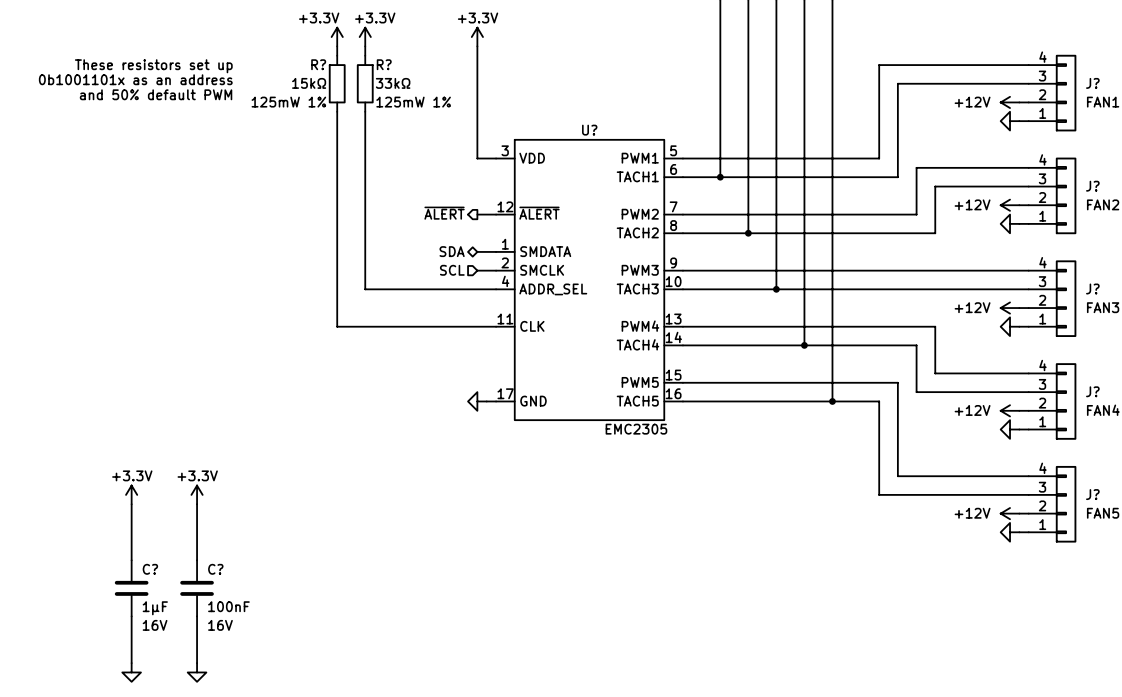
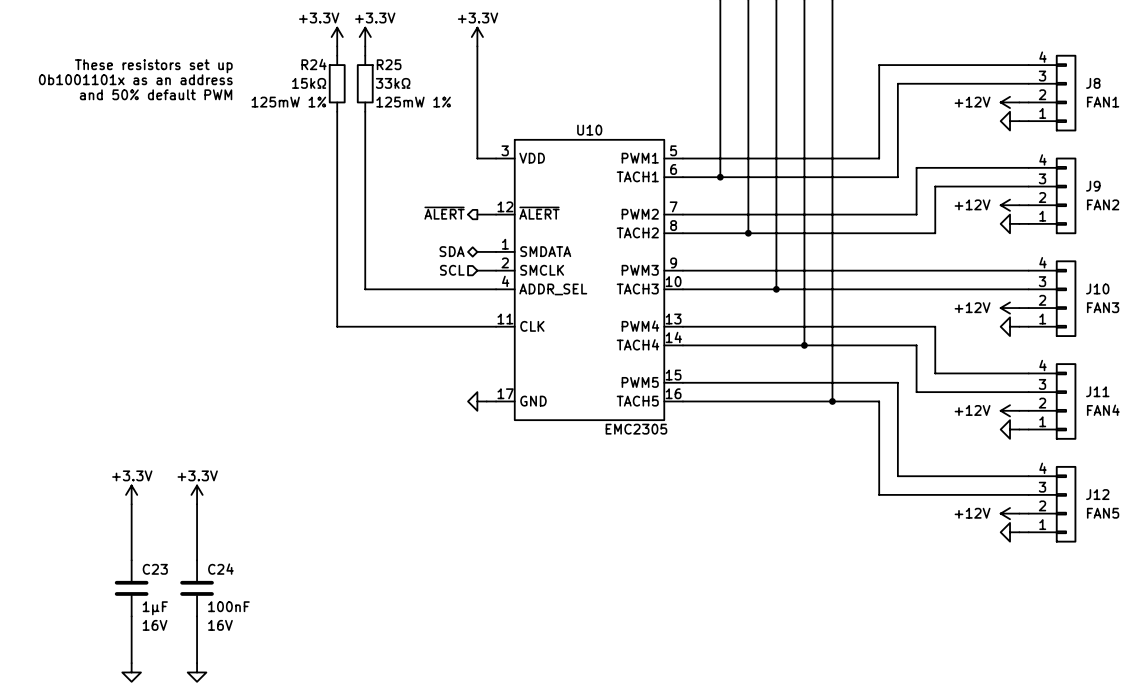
R? name: R? (318, 64) -> R24 (314, 64)
R? name: R? (384, 64) -> R25 (389, 64)
J? name: J? (1092, 83) -> J8 (1093, 83)
U? name: U? (589, 130) -> U10 (589, 130)
J? name: J? (1092, 186) -> J9 (1093, 186)
J? name: J? (1092, 288) -> J10 (1097, 288)
J? name: J? (1092, 391) -> J11 (1097, 391)
J? name: J? (1092, 494) -> J12 (1097, 494)
C? name: C? (150, 569) -> C23 (155, 569)
C? name: C? (215, 569) -> C24 (220, 569)

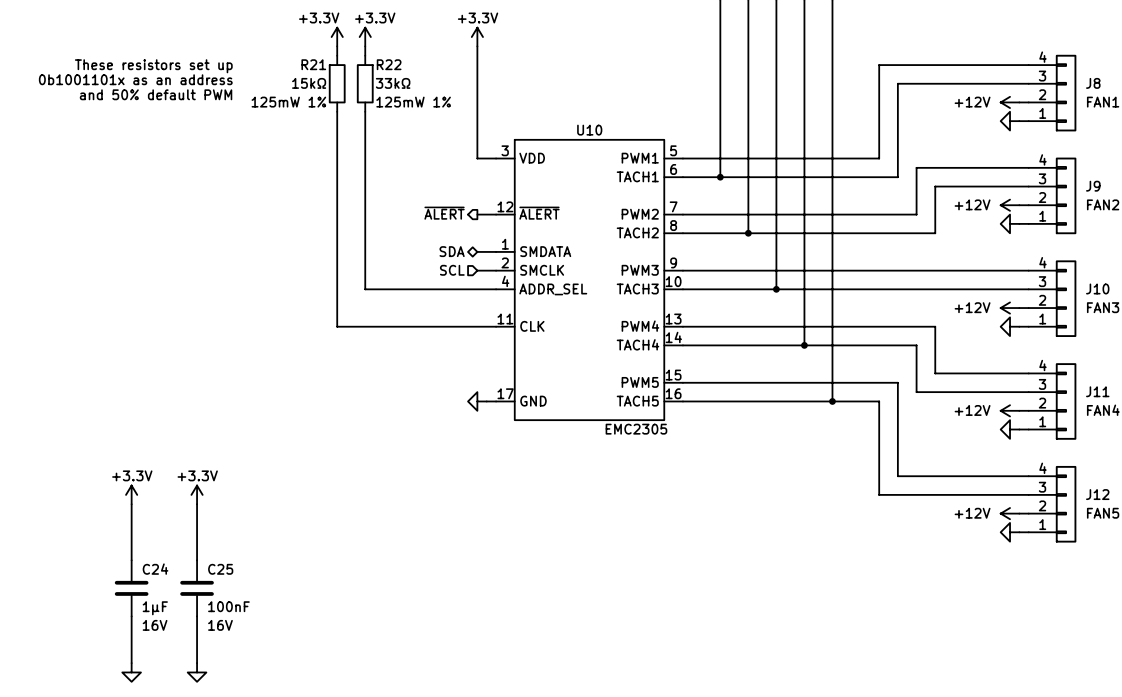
R24 name: R24 (314, 64) -> R21 (313, 64)
R25 name: R25 (389, 64) -> R22 (389, 64)
C23 name: C23 (155, 569) -> C24 (155, 569)
C24 name: C24 (220, 569) -> C25 (220, 569)

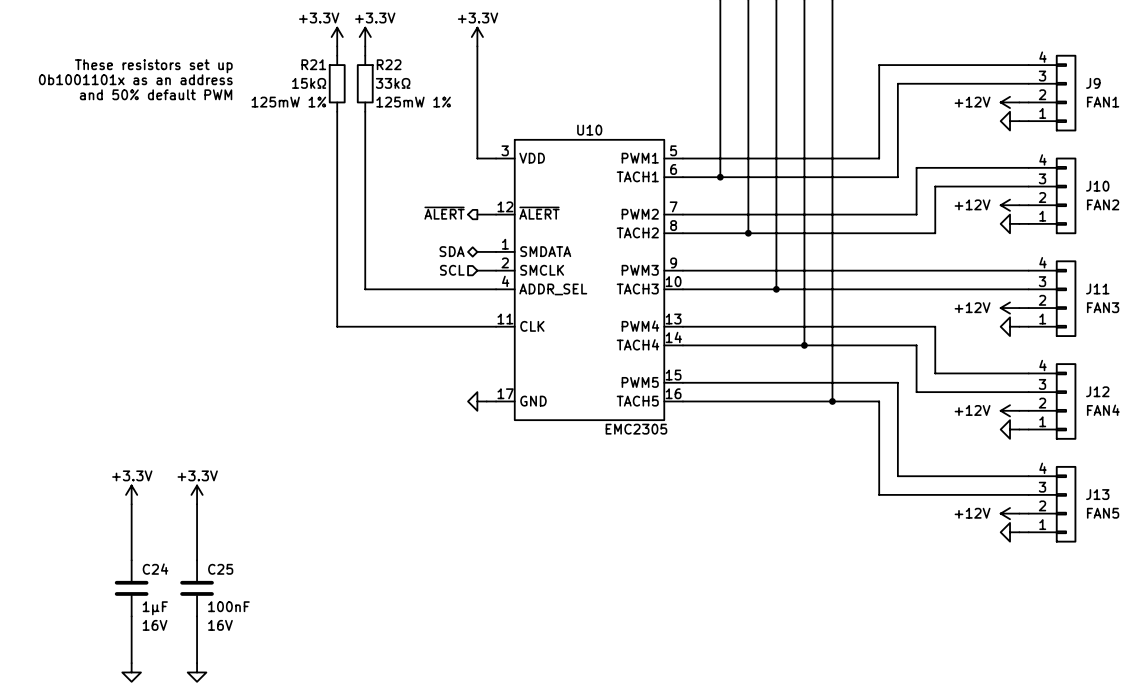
J8 name: J8 (1093, 83) -> J9 (1093, 83)
J9 name: J9 (1093, 186) -> J10 (1097, 186)
J10 name: J10 (1097, 288) -> J11 (1097, 288)
J11 name: J11 (1097, 391) -> J12 (1097, 391)
J12 name: J12 (1097, 494) -> J13 (1097, 494)

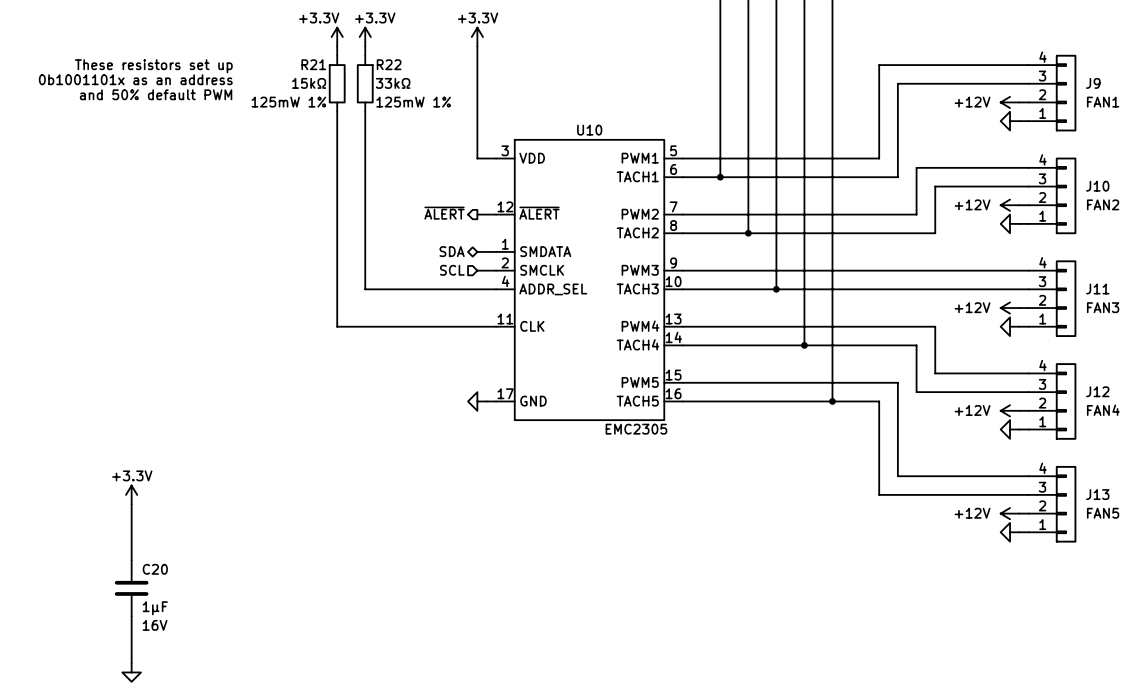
power symbol: +3.3V (197, 494) -> none
wire: (197, 504) (197, 560) -> none
C24 name: C24 (155, 569) -> C20 (155, 569)
C25: 100nF (197, 588) -> none
wire: (197, 616) (197, 663) -> none
power symbol: (197, 672) -> none

